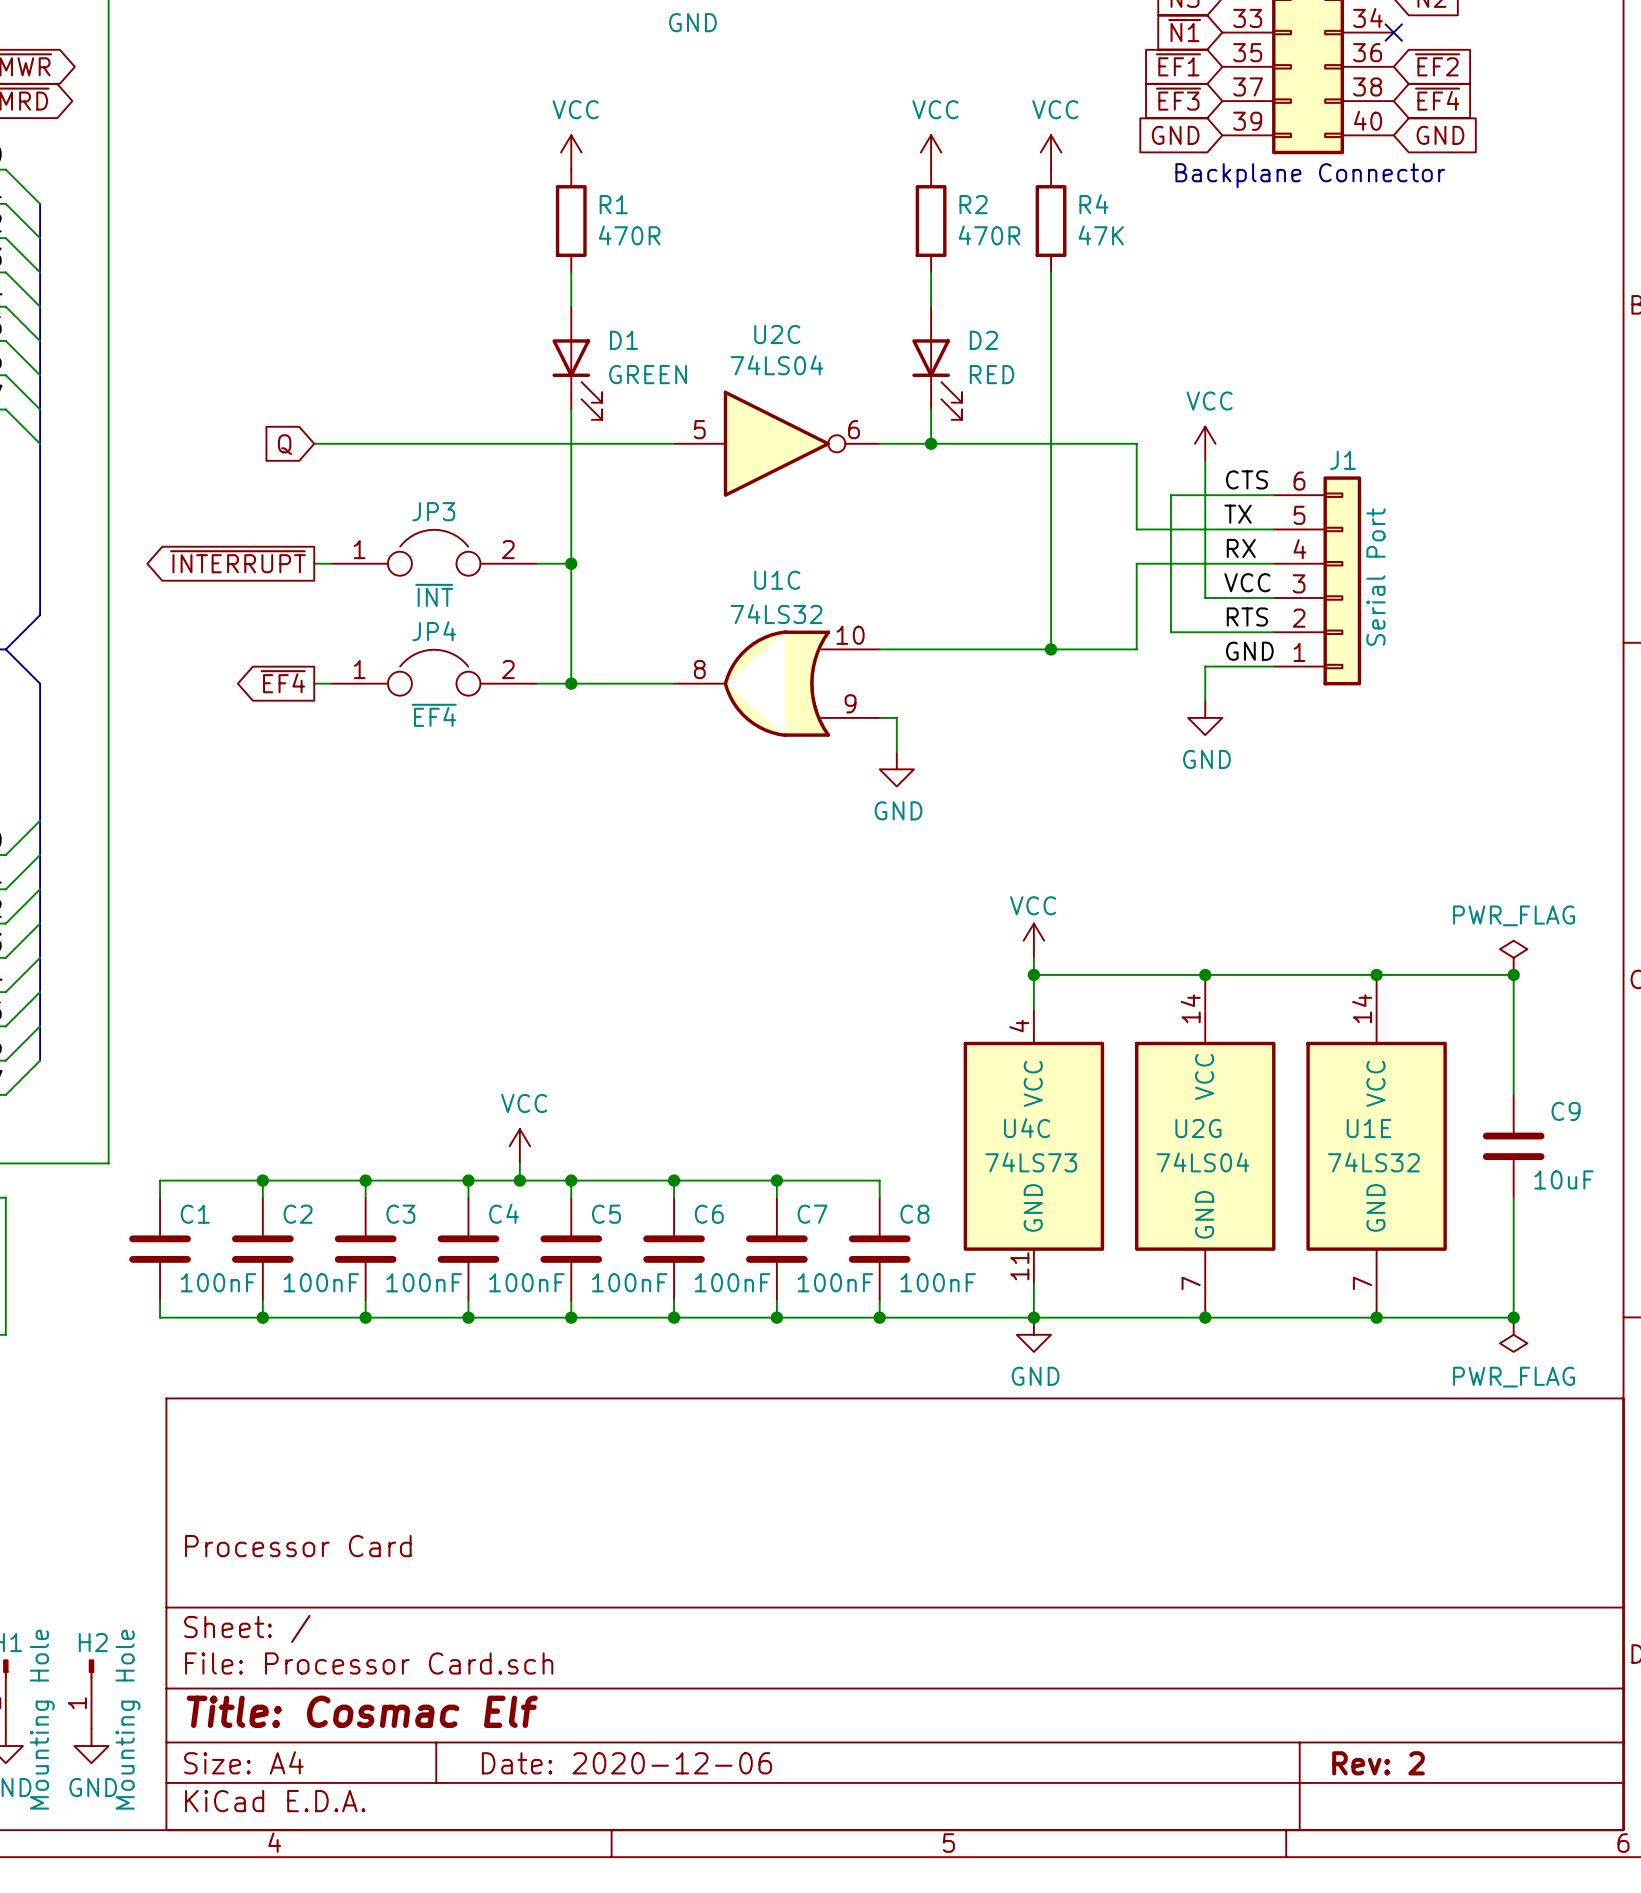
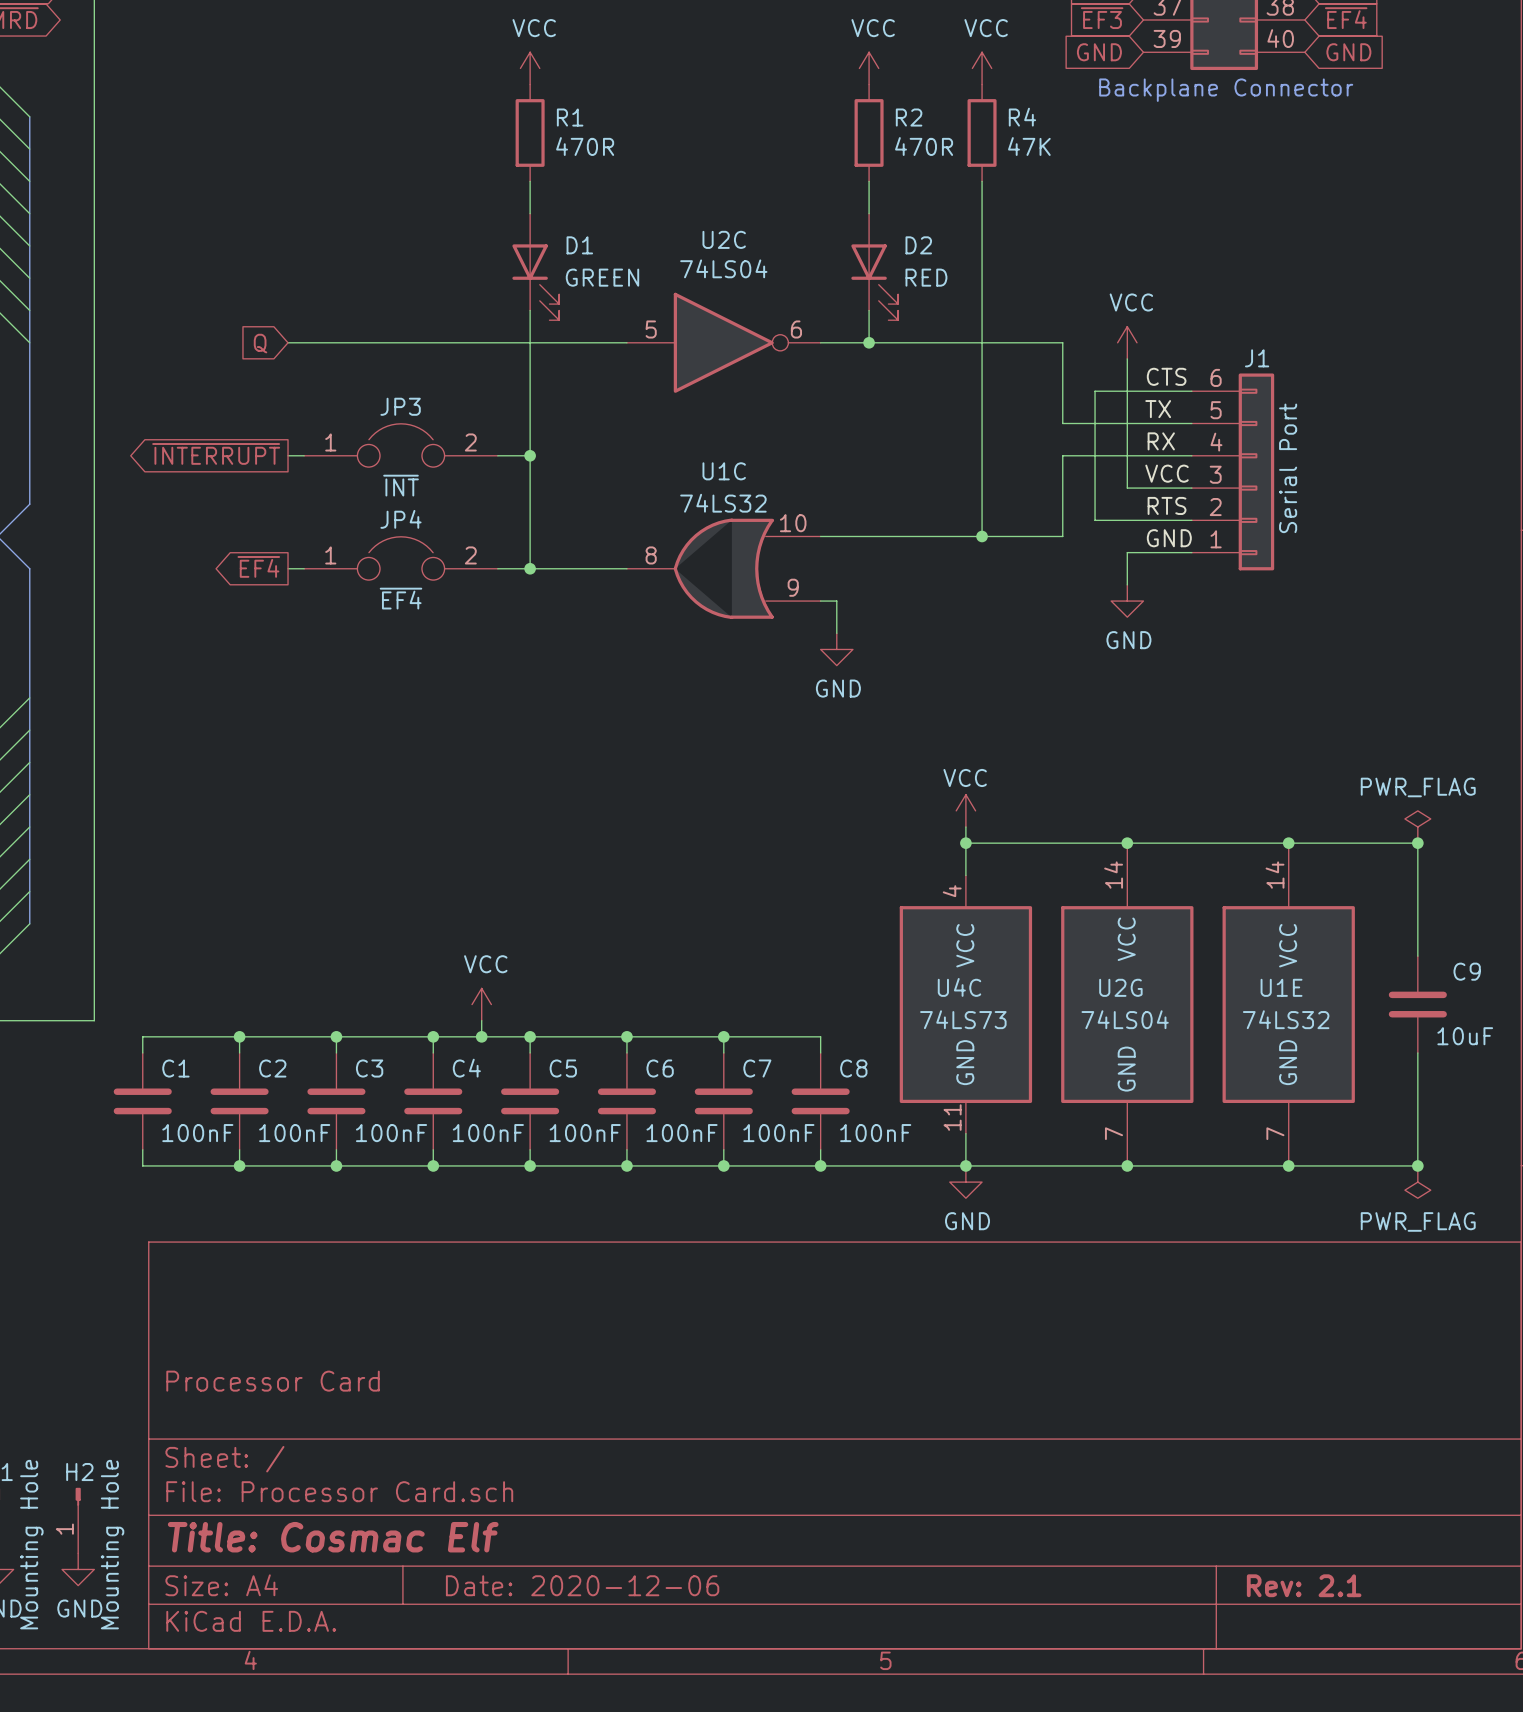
title block: Rev: 2 (1378, 1763) -> Rev: 2.1 (1304, 1585)

